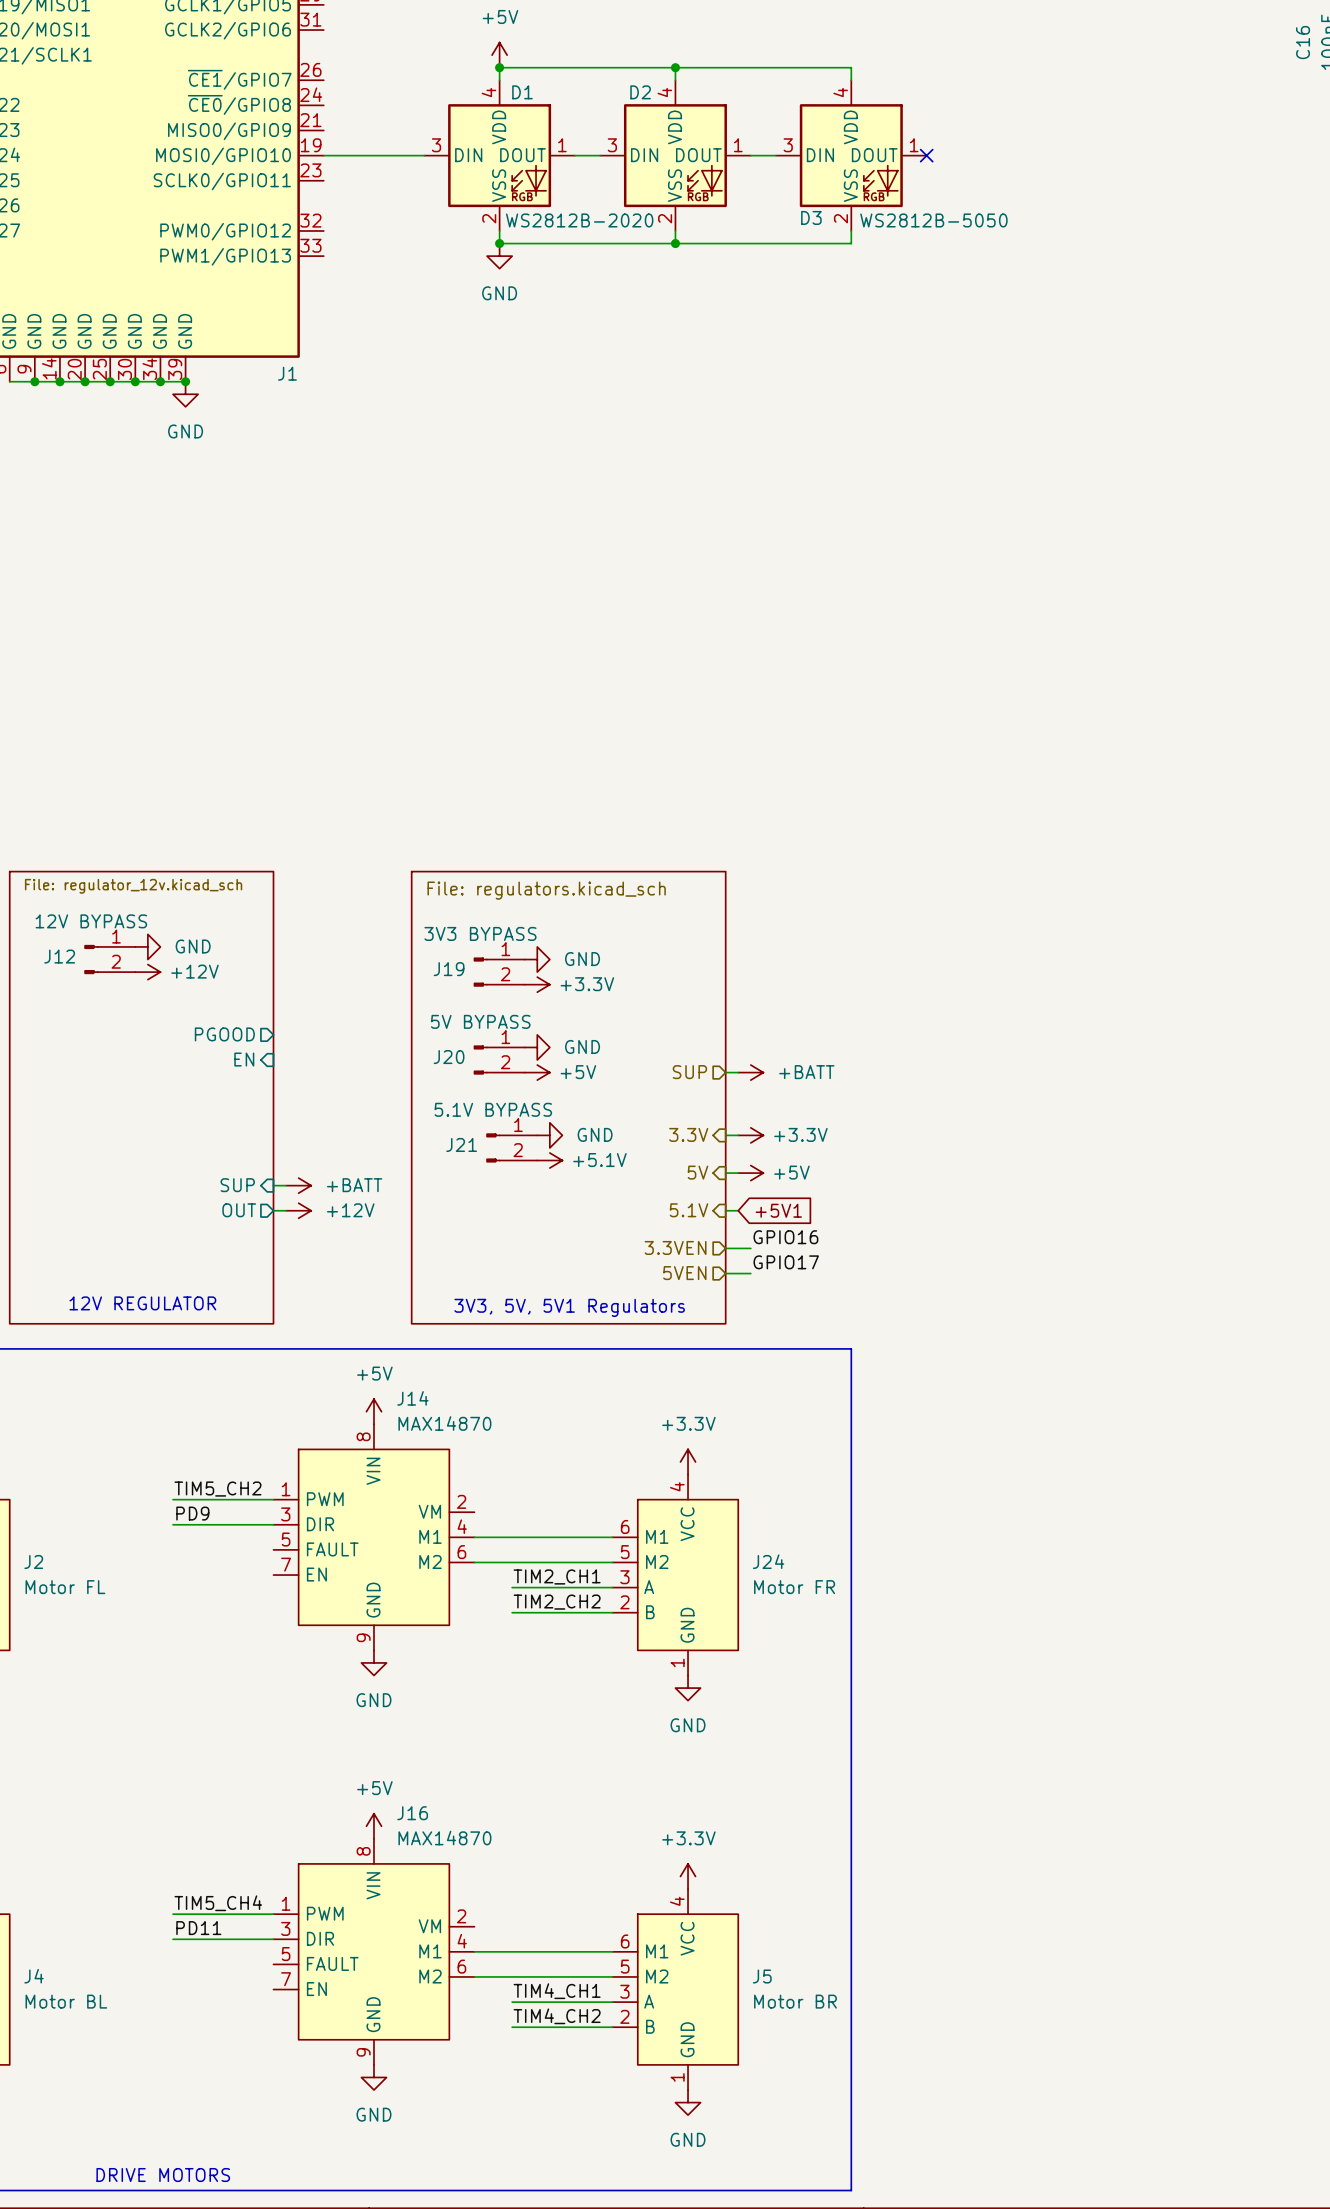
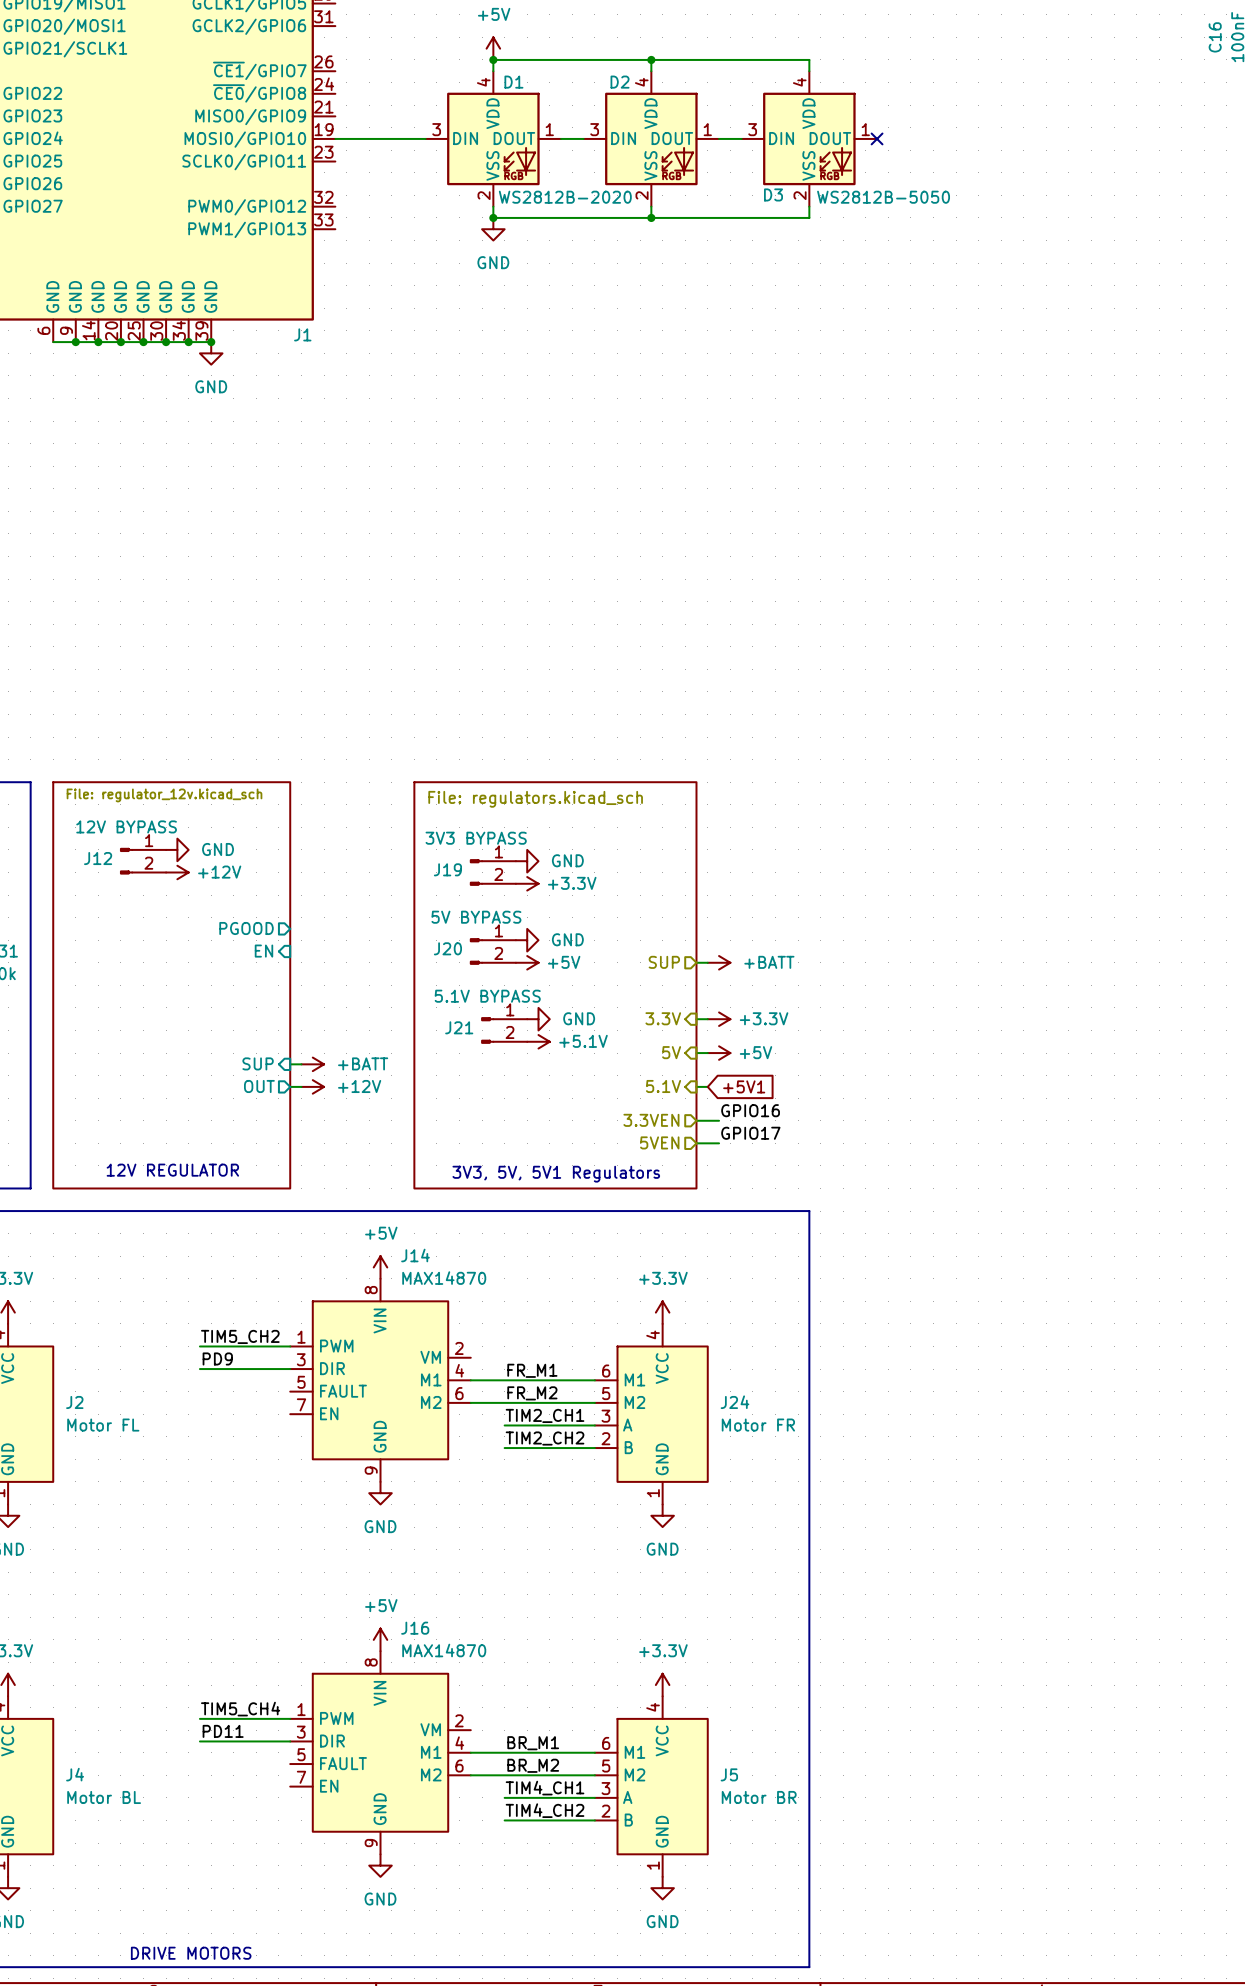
label: none -> FR_M1 (532, 1370)
label: none -> FR_M2 (532, 1393)
label: none -> BR_M1 (533, 1743)
label: none -> BR_M2 (533, 1765)

